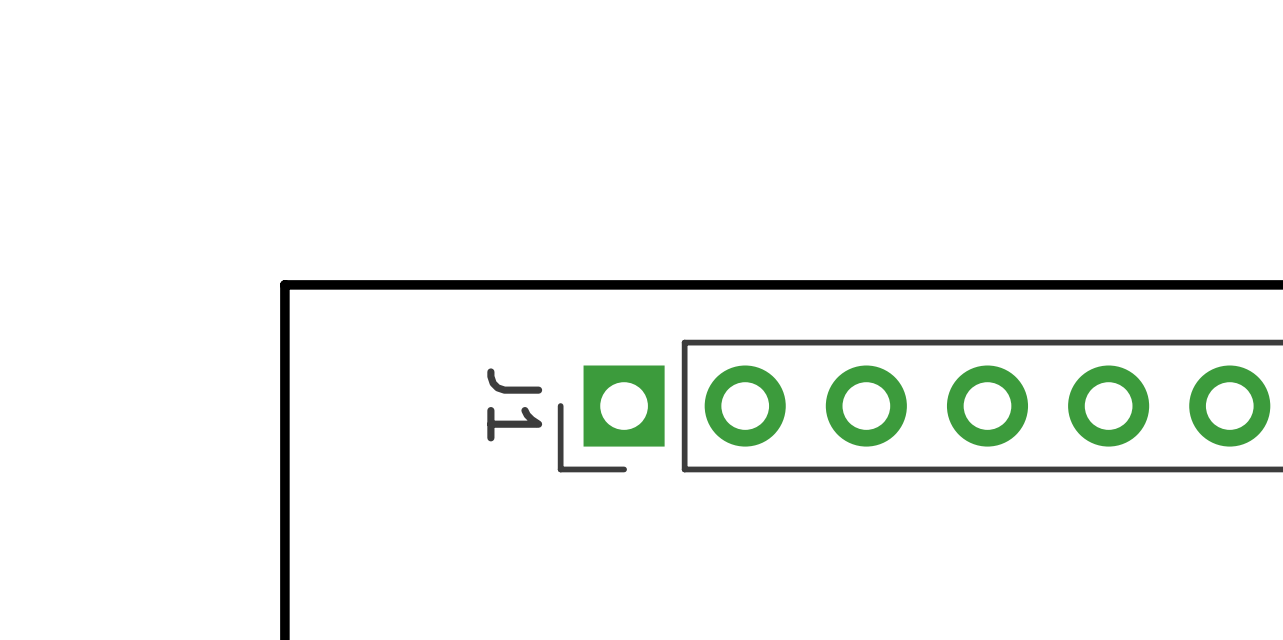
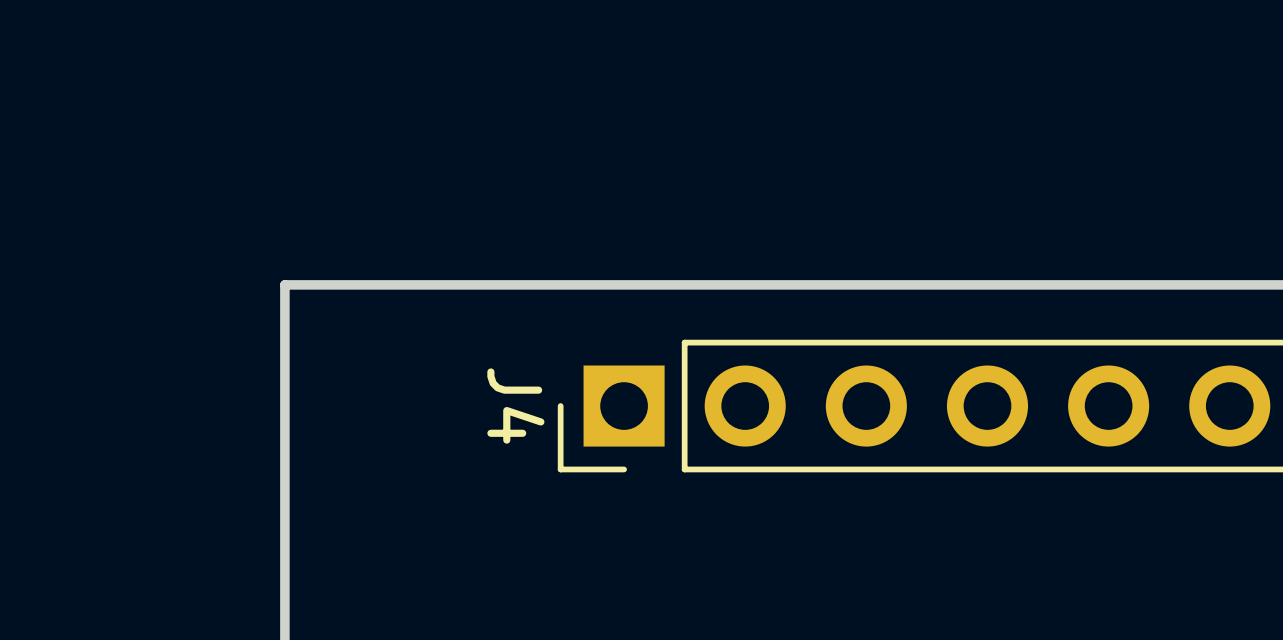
J1 name: J1 (514, 404) -> J4 (515, 406)

